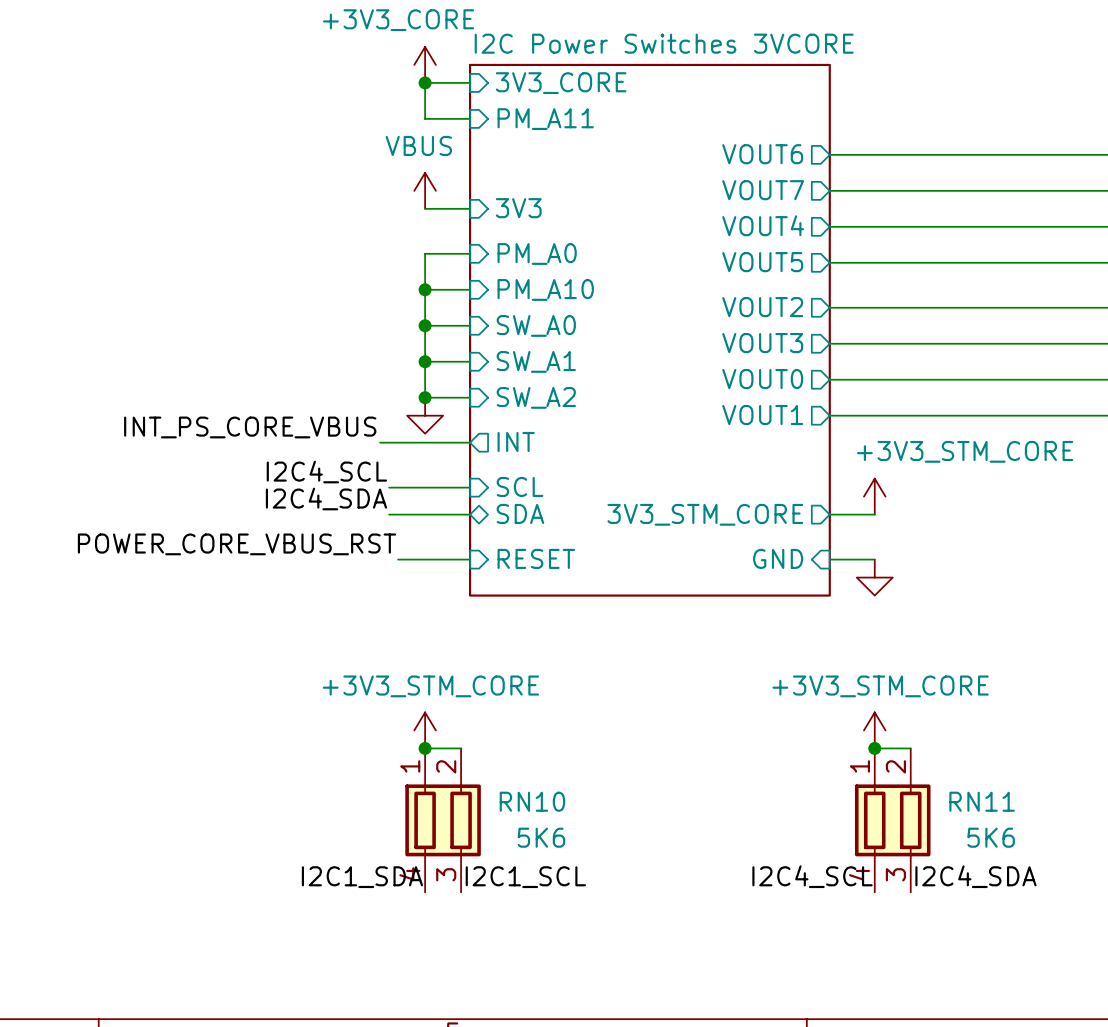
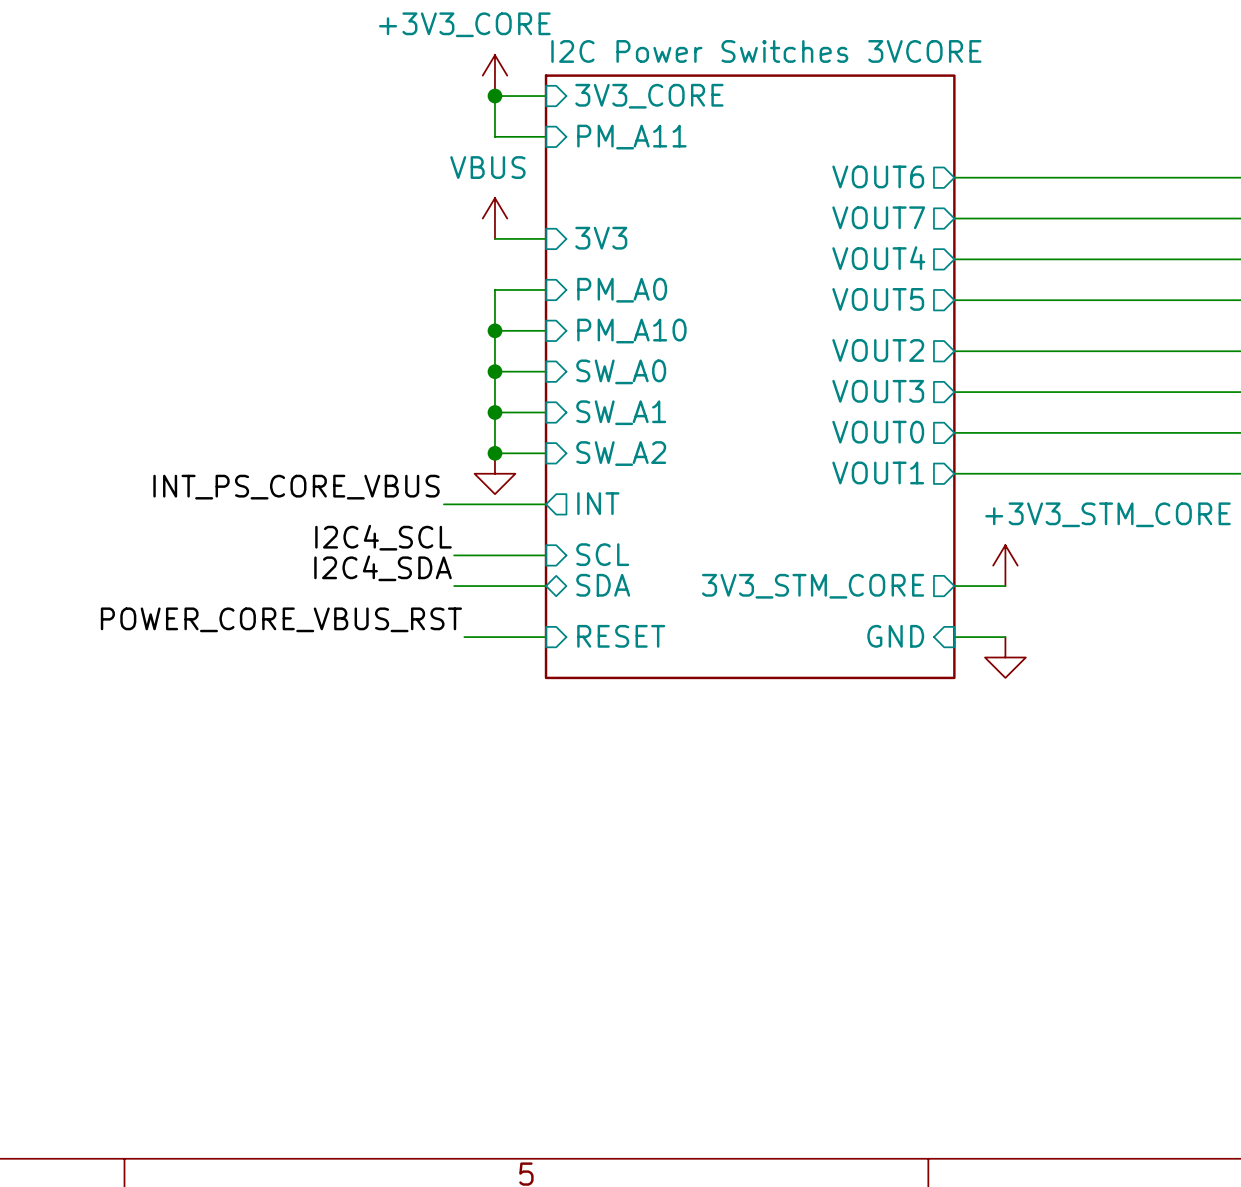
power symbol: +3V3_STM_CORE (425, 730) -> none
power symbol: +3V3_STM_CORE (874, 730) -> none
wire: (425, 748) (461, 748) -> none
junction: (425, 748) -> none
wire: (874, 748) (910, 748) -> none
junction: (874, 748) -> none
RN10: 5K6 (443, 820) -> none
RN11: 5K6 (892, 820) -> none
label: I2C4_SCL (812, 876) -> none
label: I2C4_SDA (975, 876) -> none
label: I2C1_SDA (362, 877) -> none
label: I2C1_SCL (525, 877) -> none

